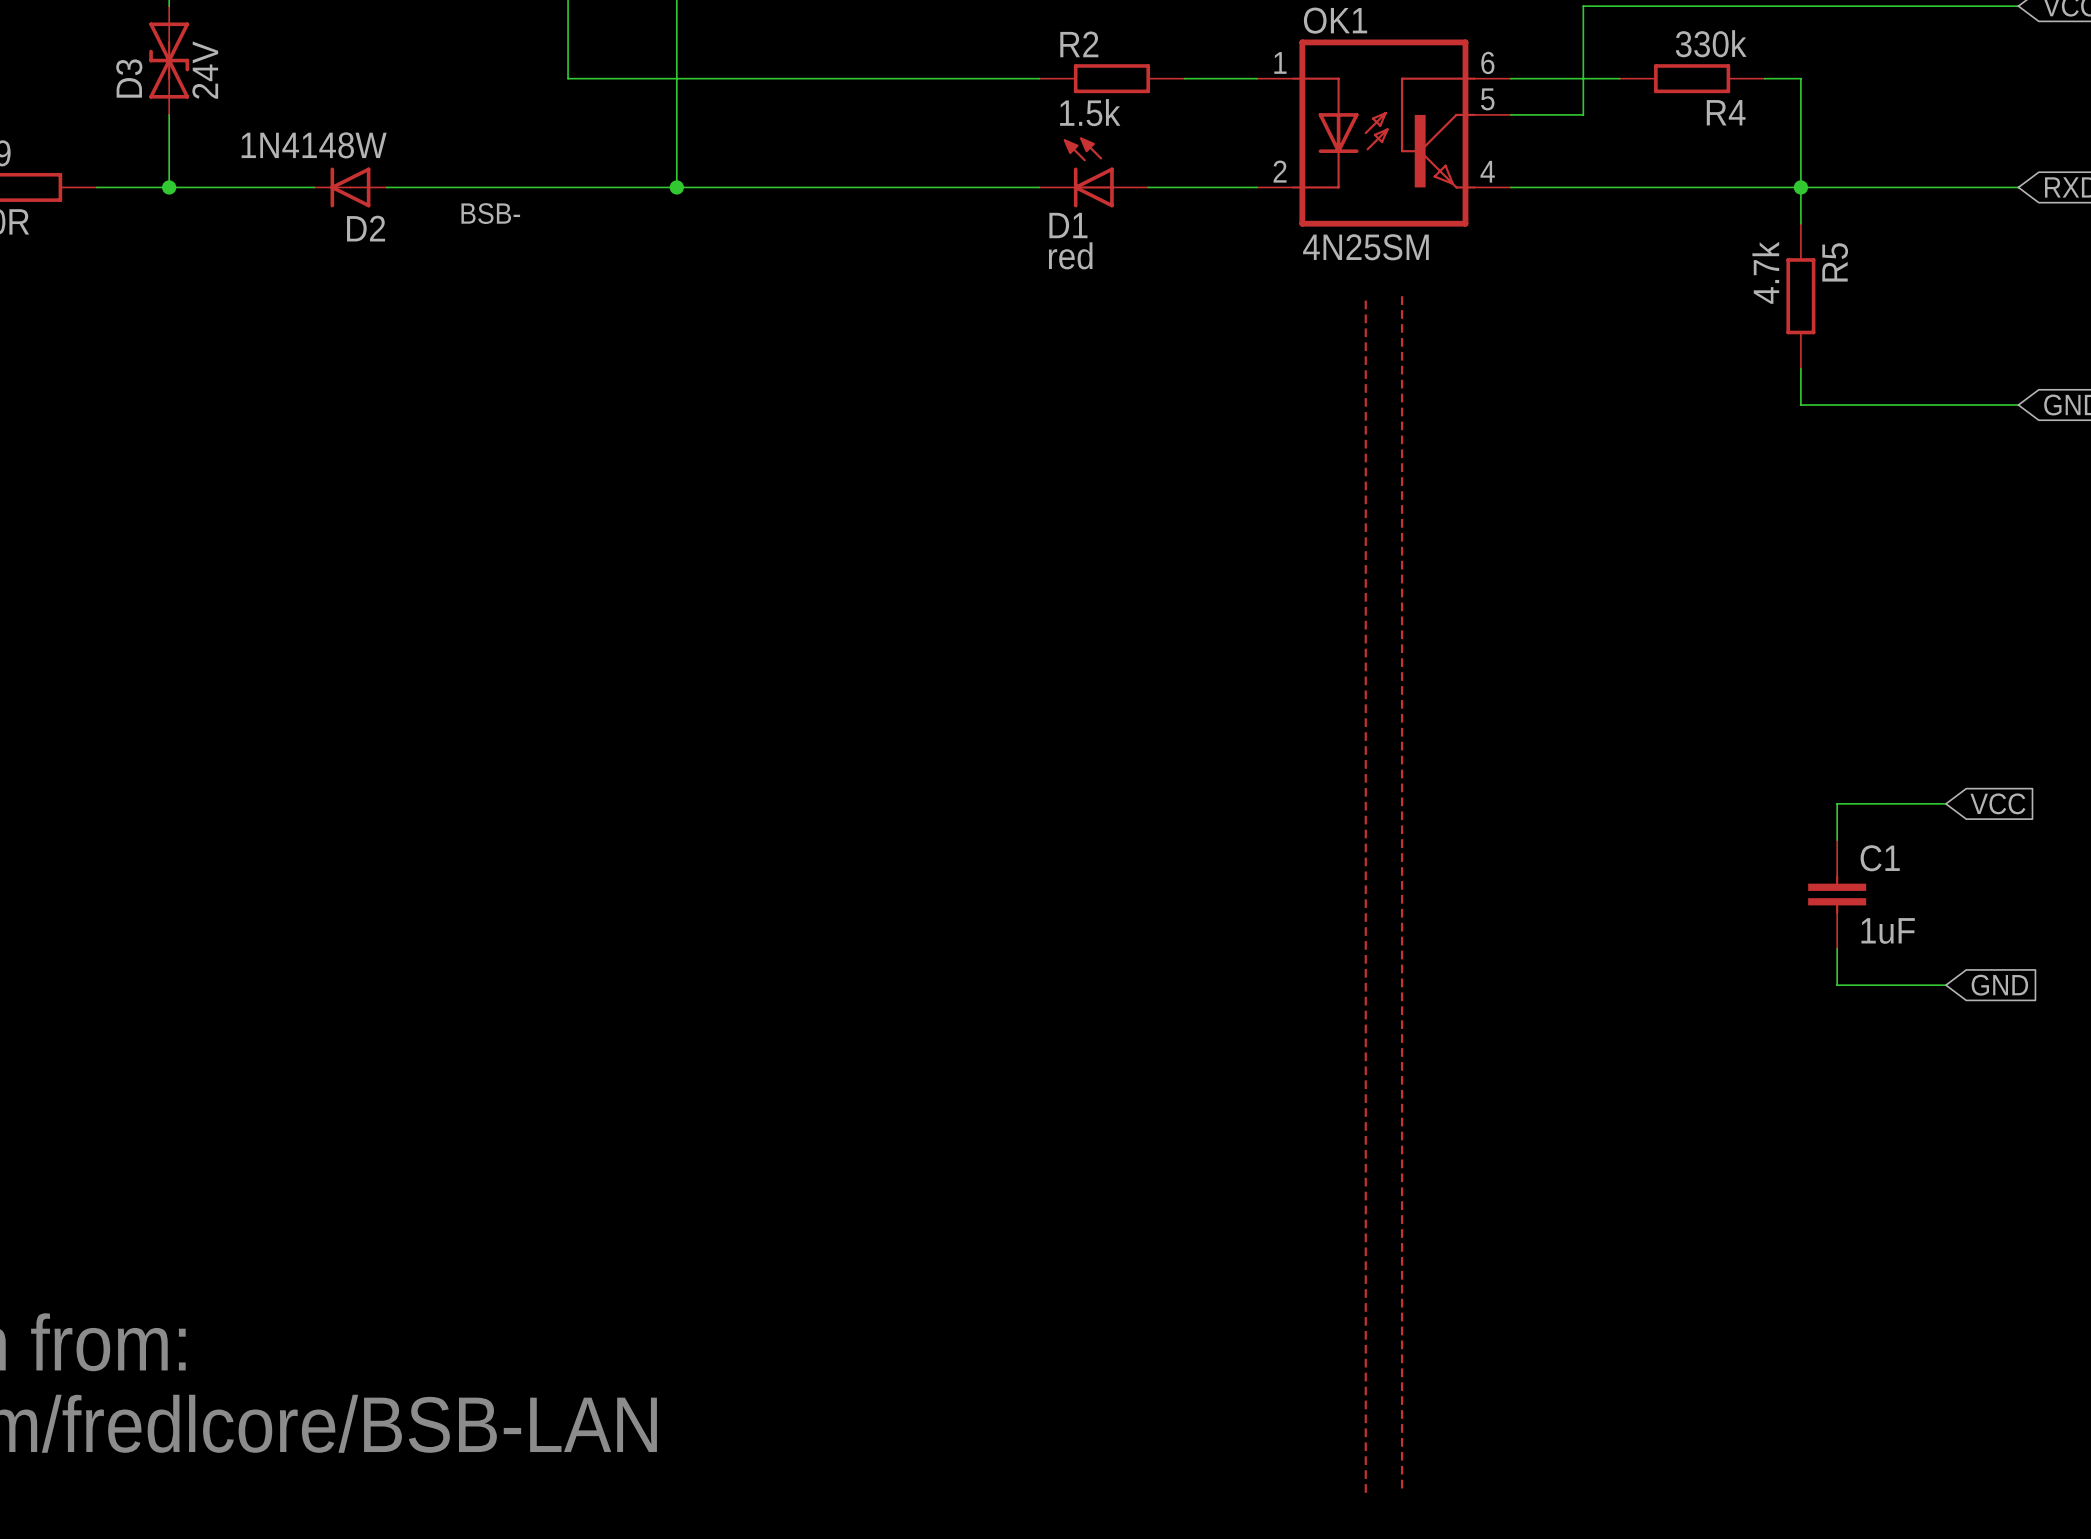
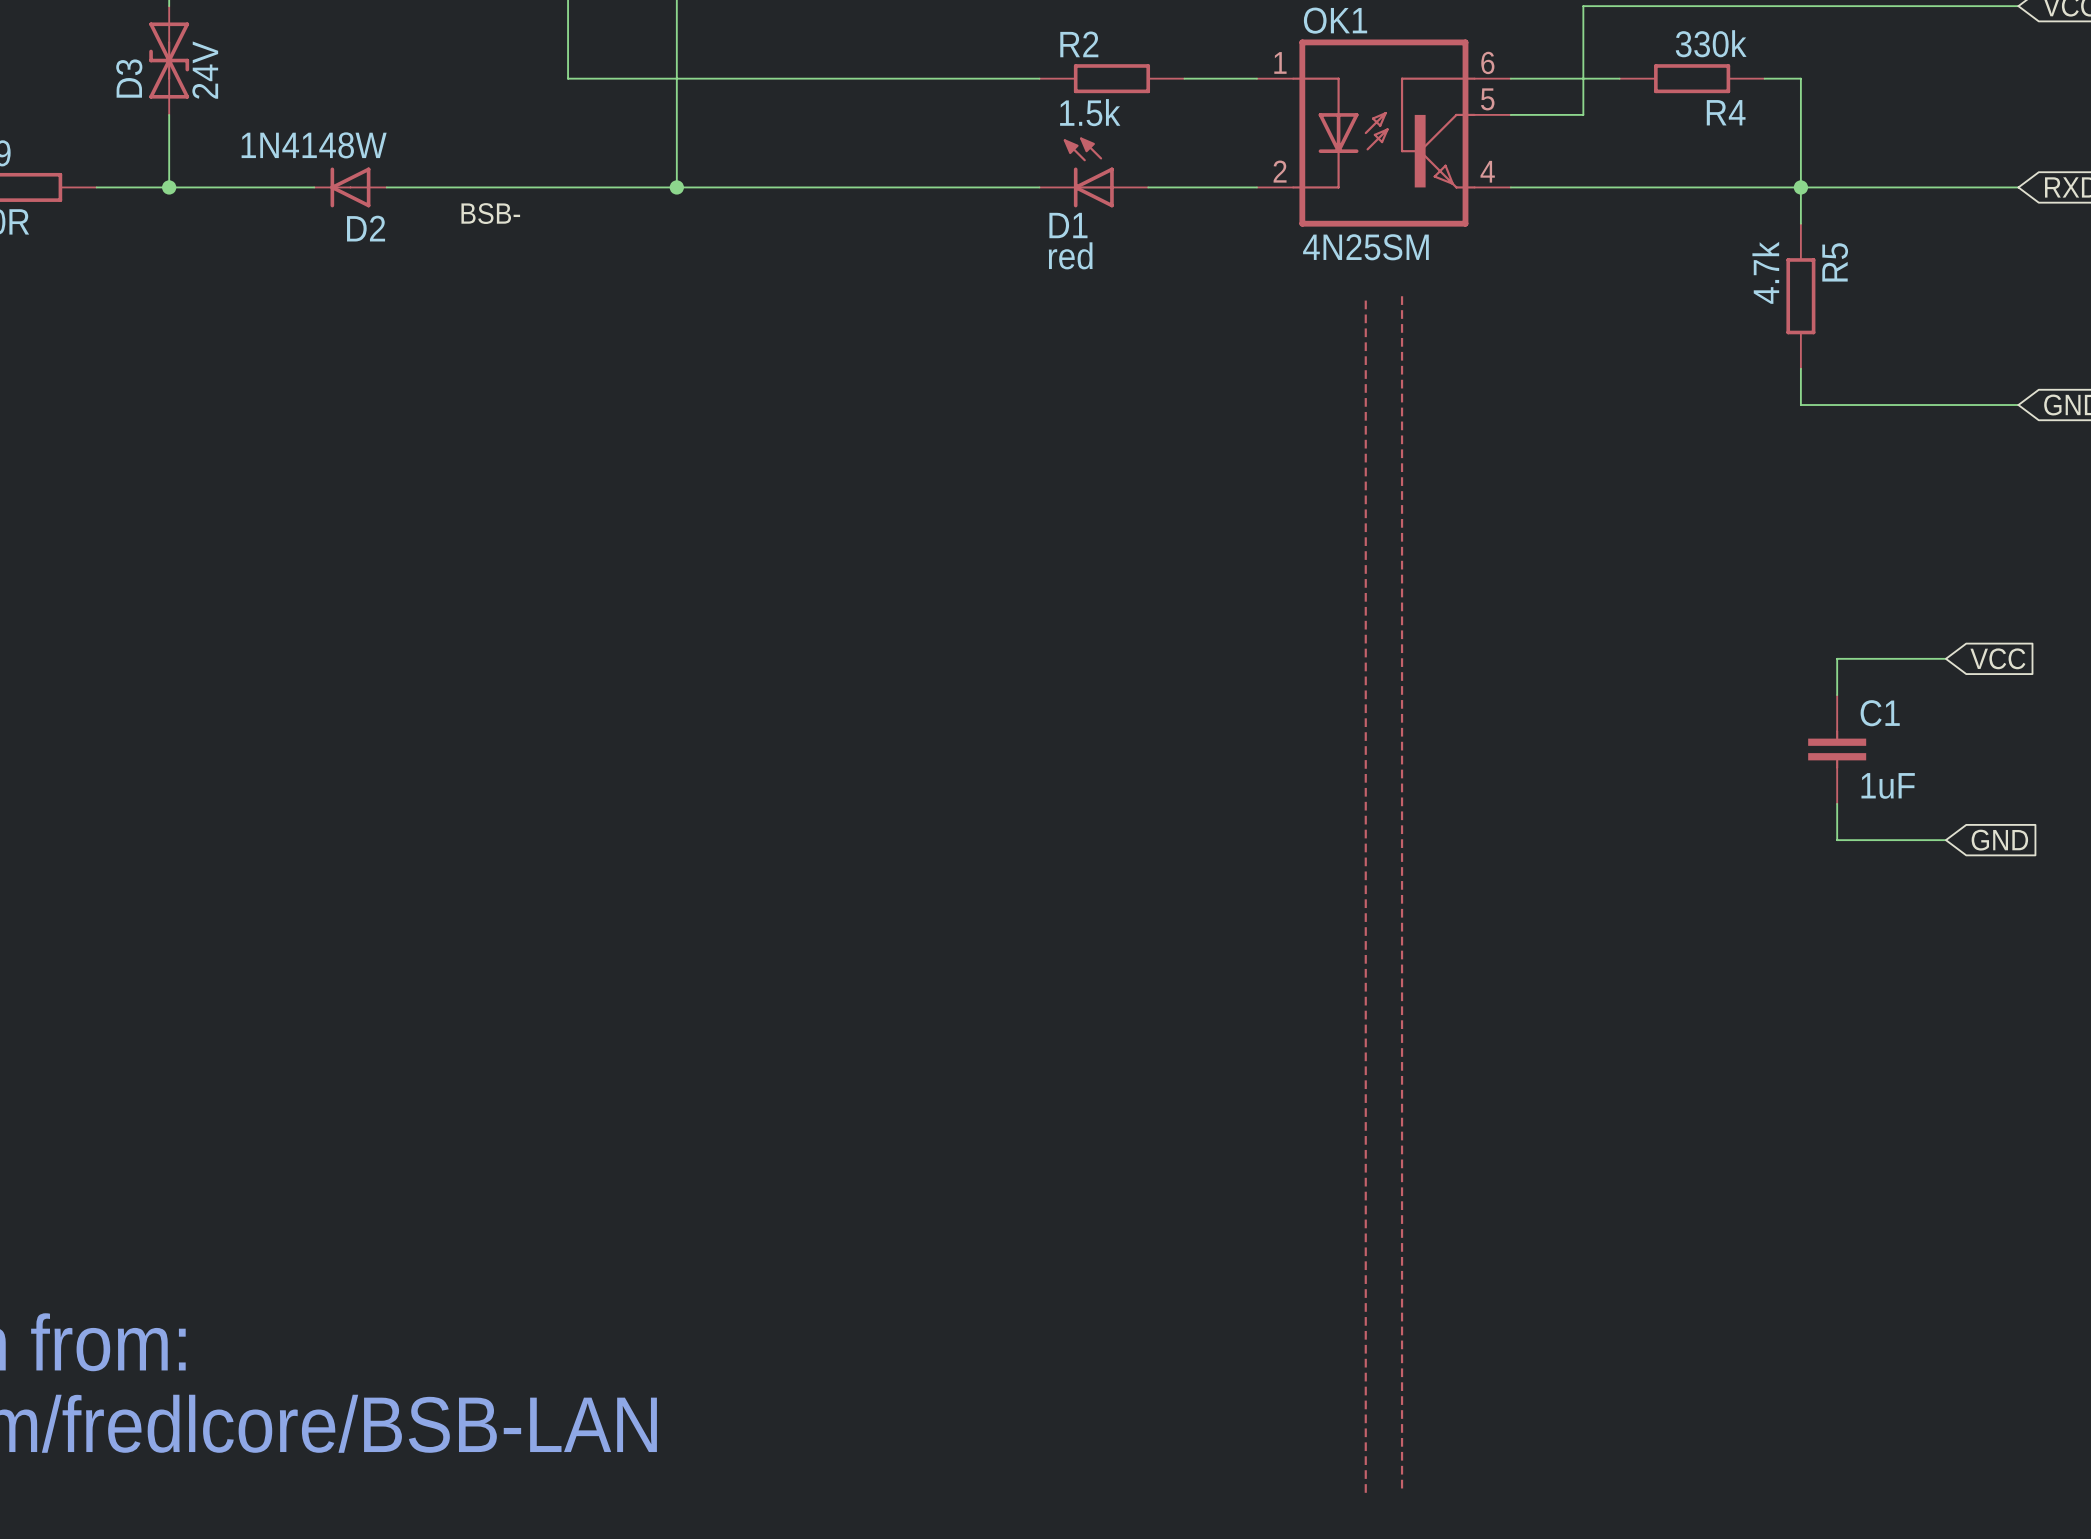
wire: none -> (1945, 658) (1837, 658) (1837, 695)
wire: (1837, 803) (1945, 803) -> (1837, 840) (1945, 840)
global label position: VCC (1997, 803) -> VCC (1997, 658)
C1 position: (1837, 894) -> (1837, 749)
wire: (1837, 948) (1837, 985) (1945, 985) -> none
global label position: GND (1999, 985) -> GND (1999, 840)

